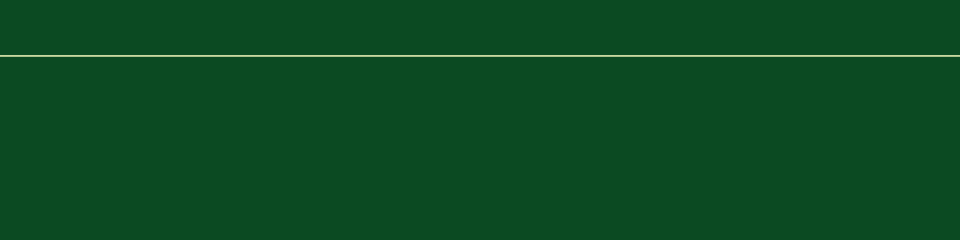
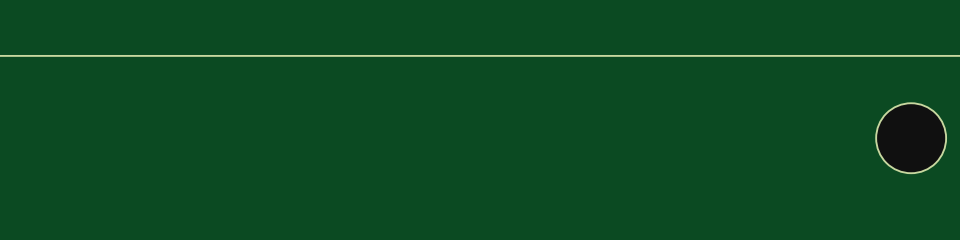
hole: none -> (911, 138)

